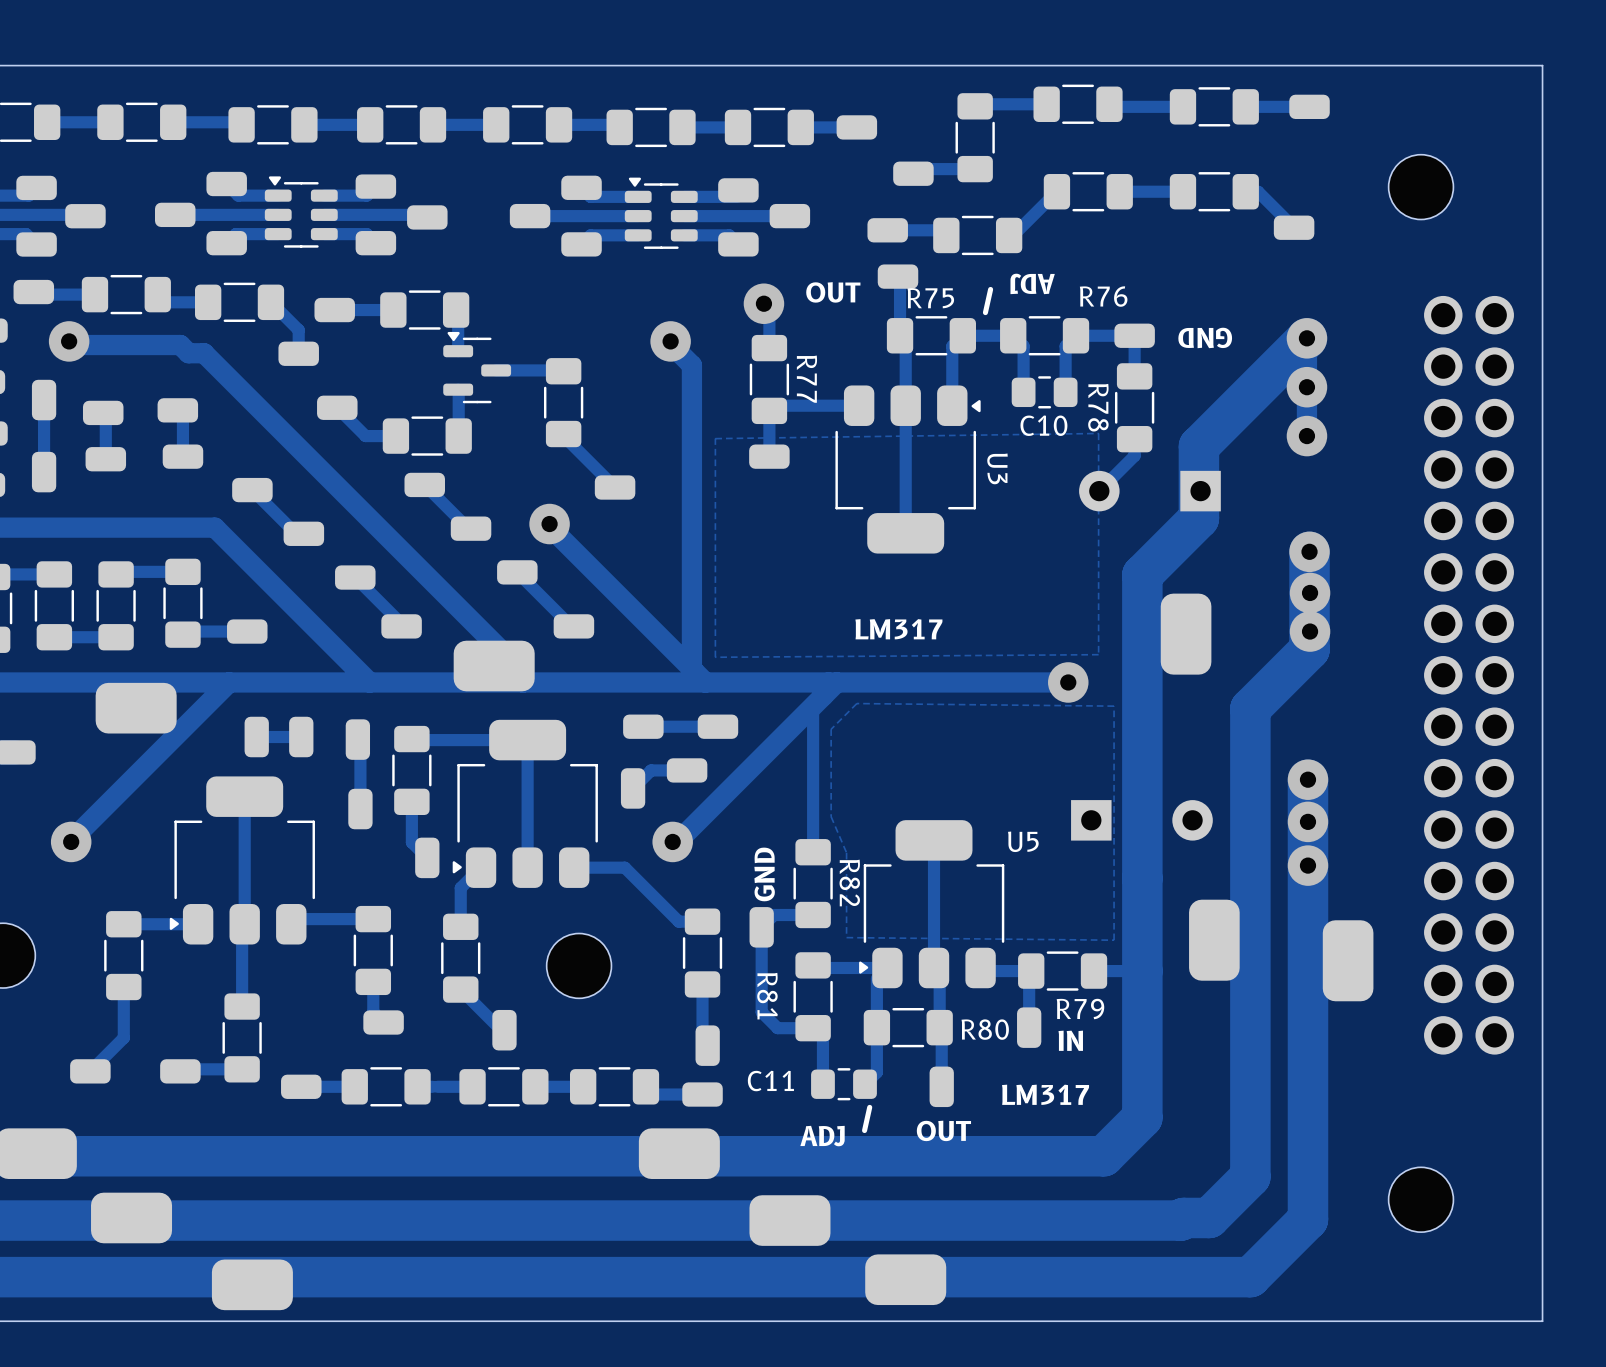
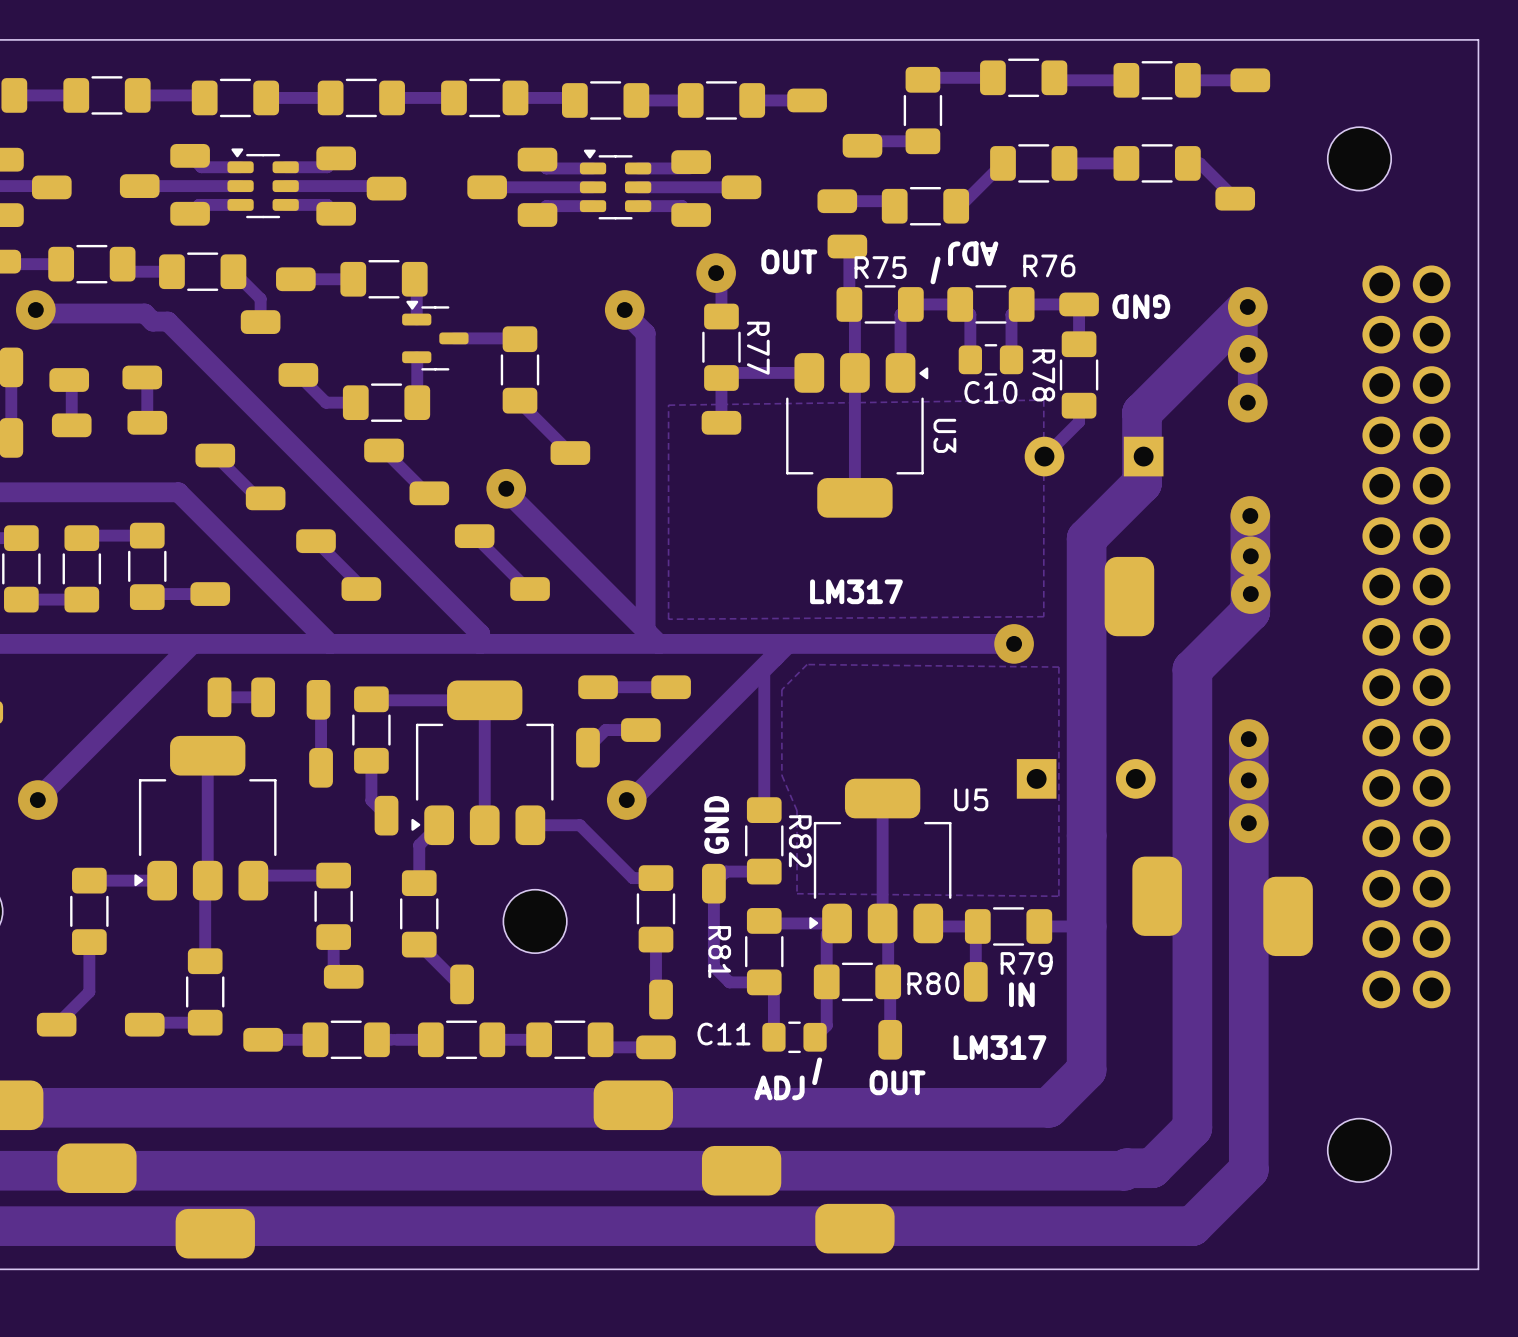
part: (494, 666) -> none
part: (136, 708) -> none

